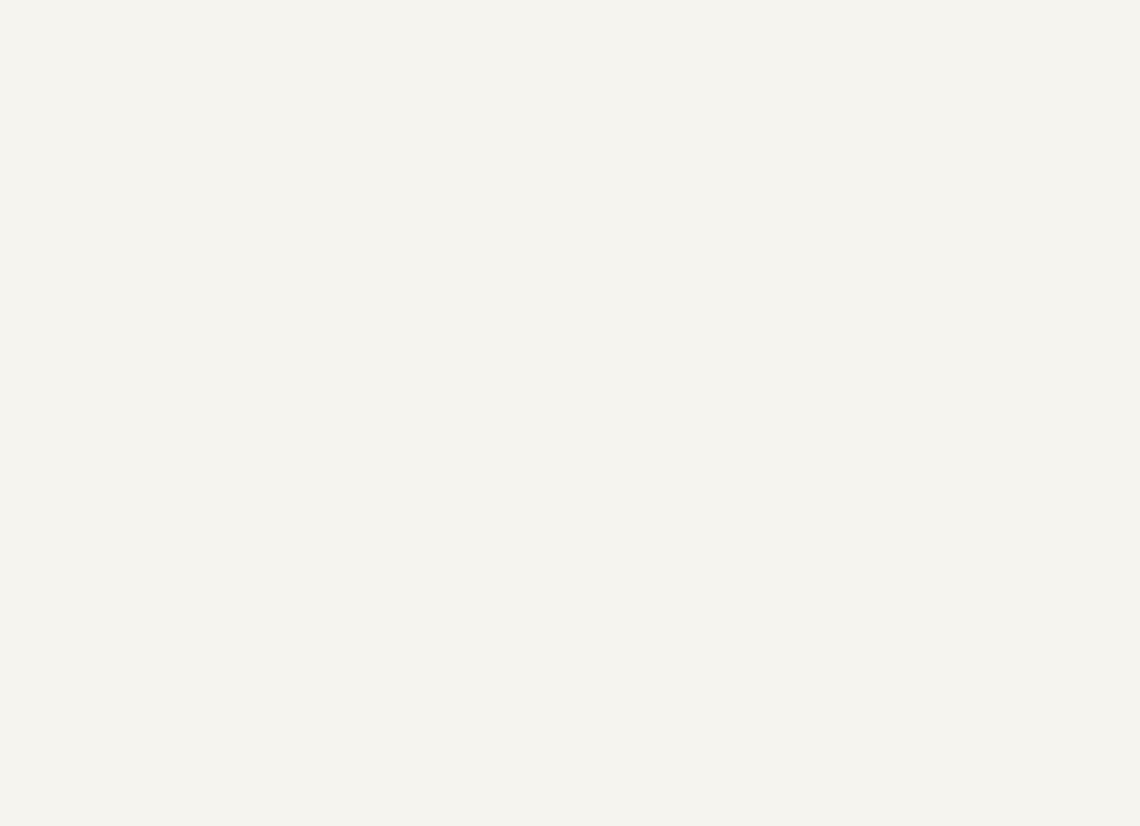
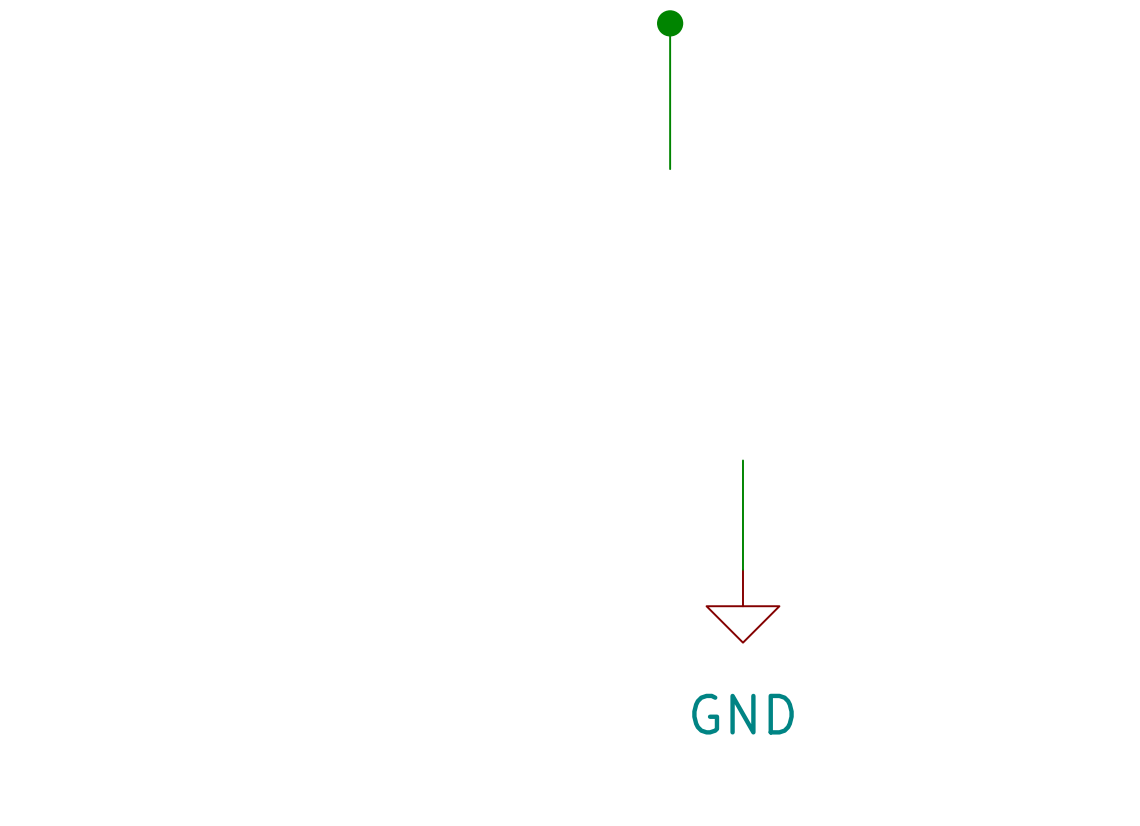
wire: none -> (670, 23) (670, 169)
junction: none -> (670, 23)
wire: none -> (742, 460) (742, 569)
power symbol: none -> GND (742, 606)

